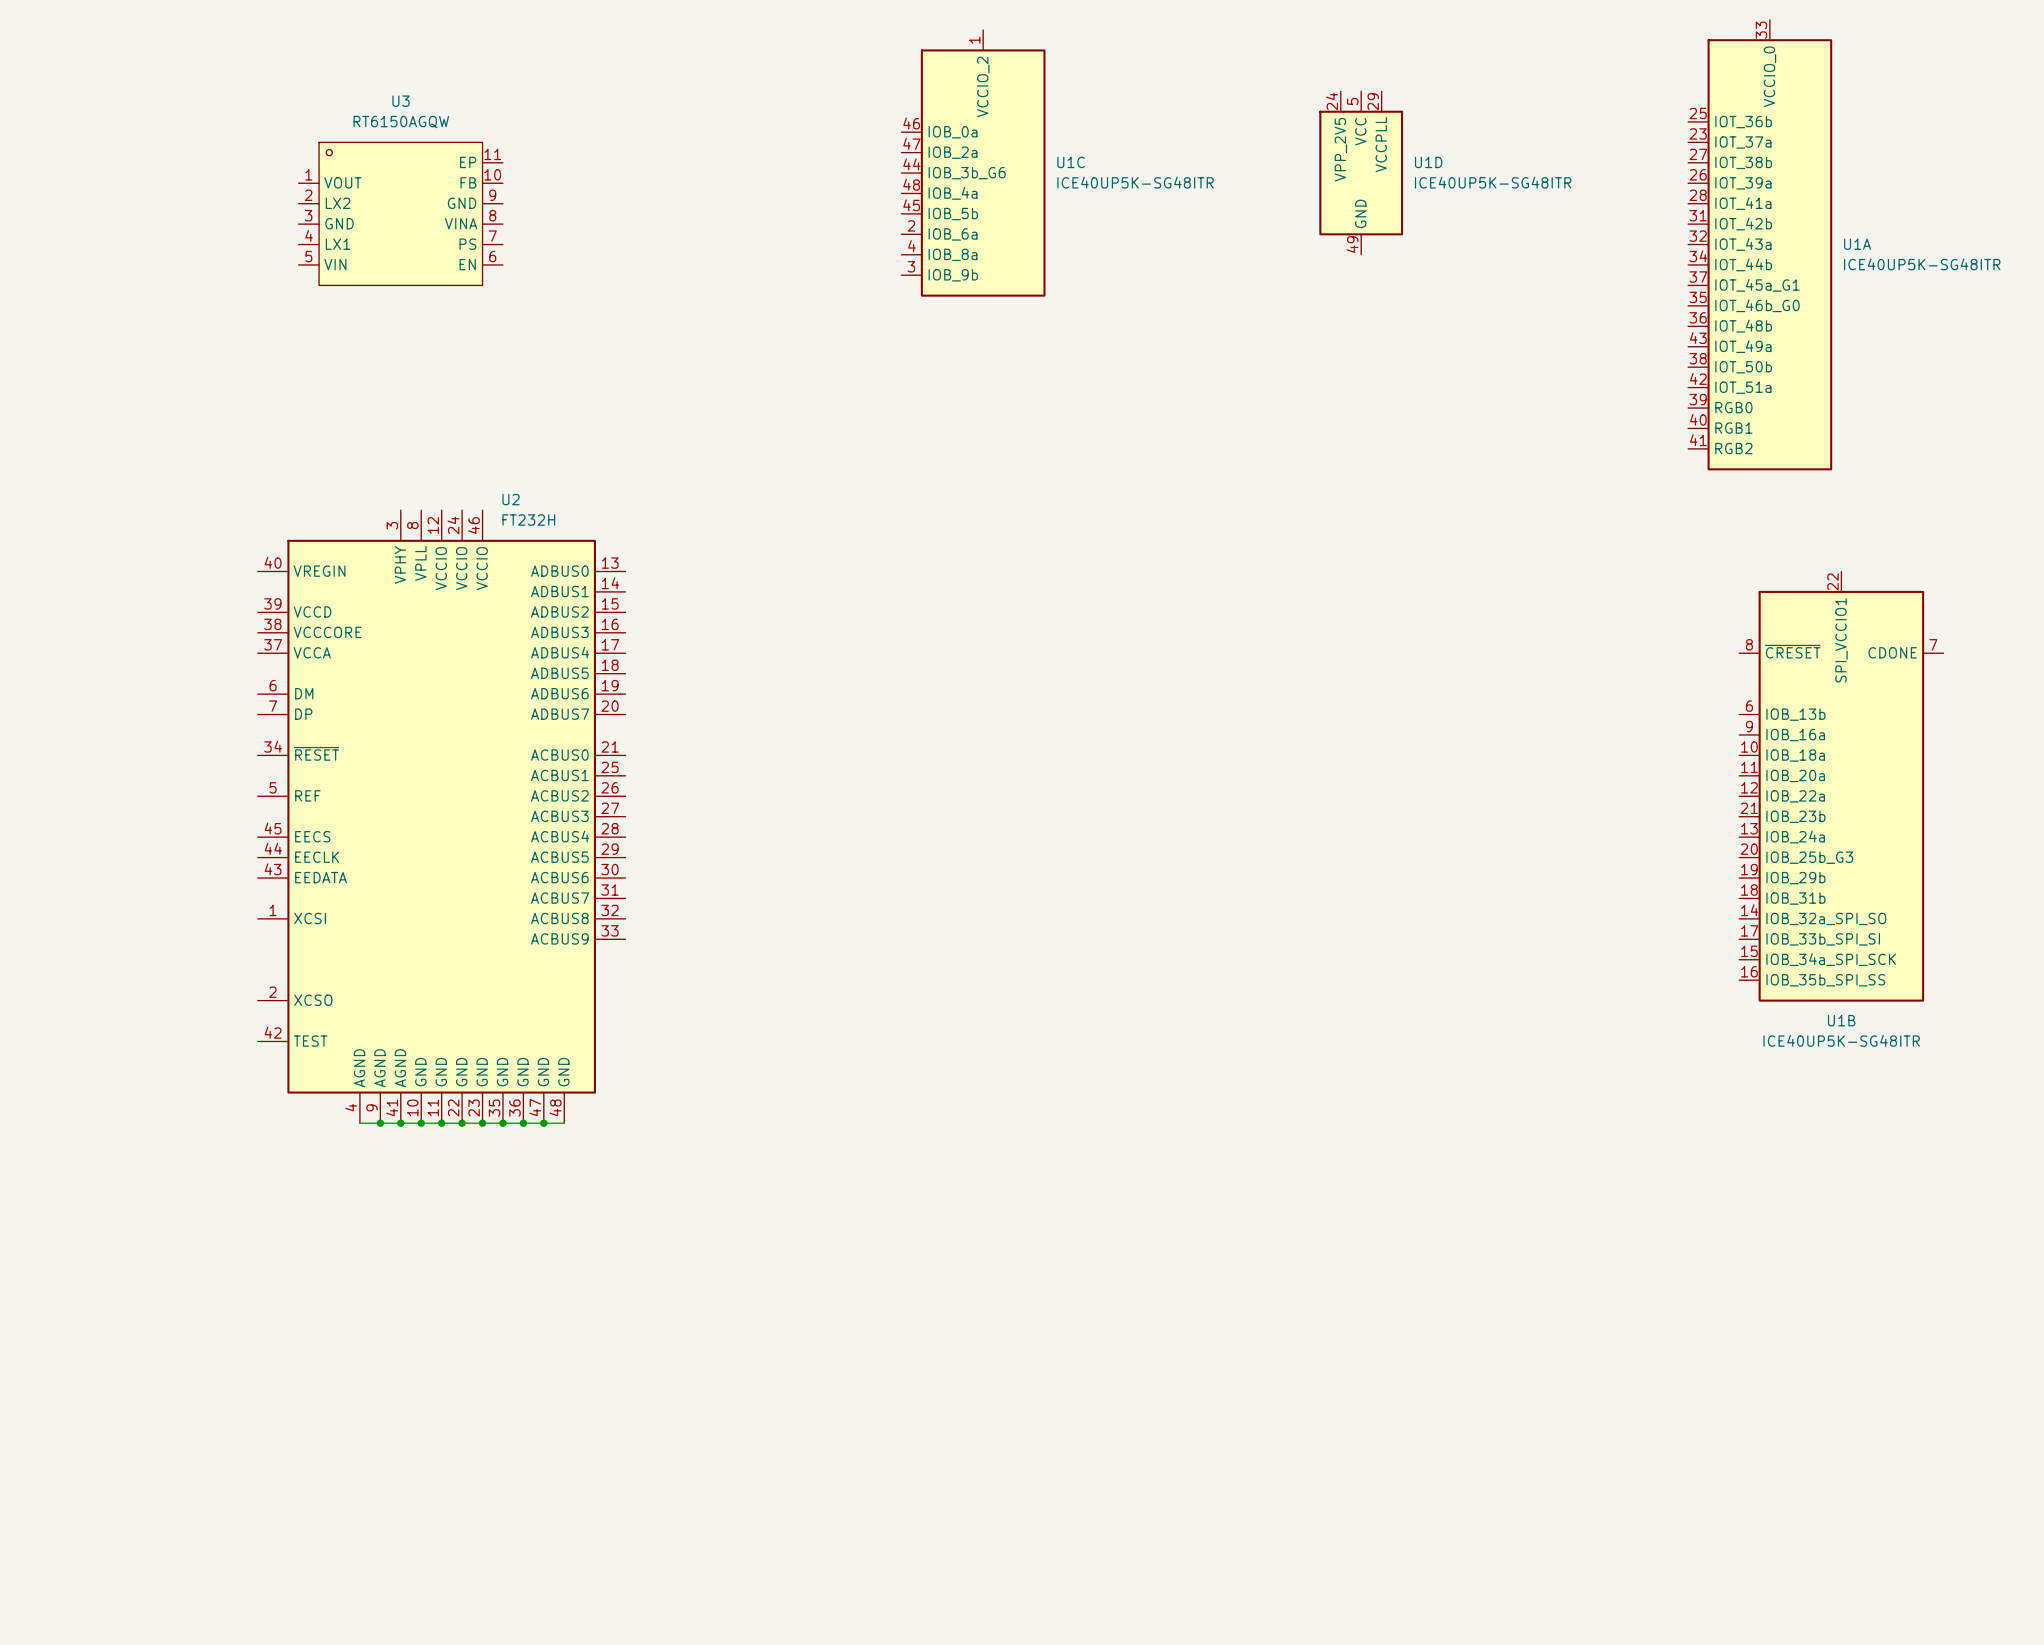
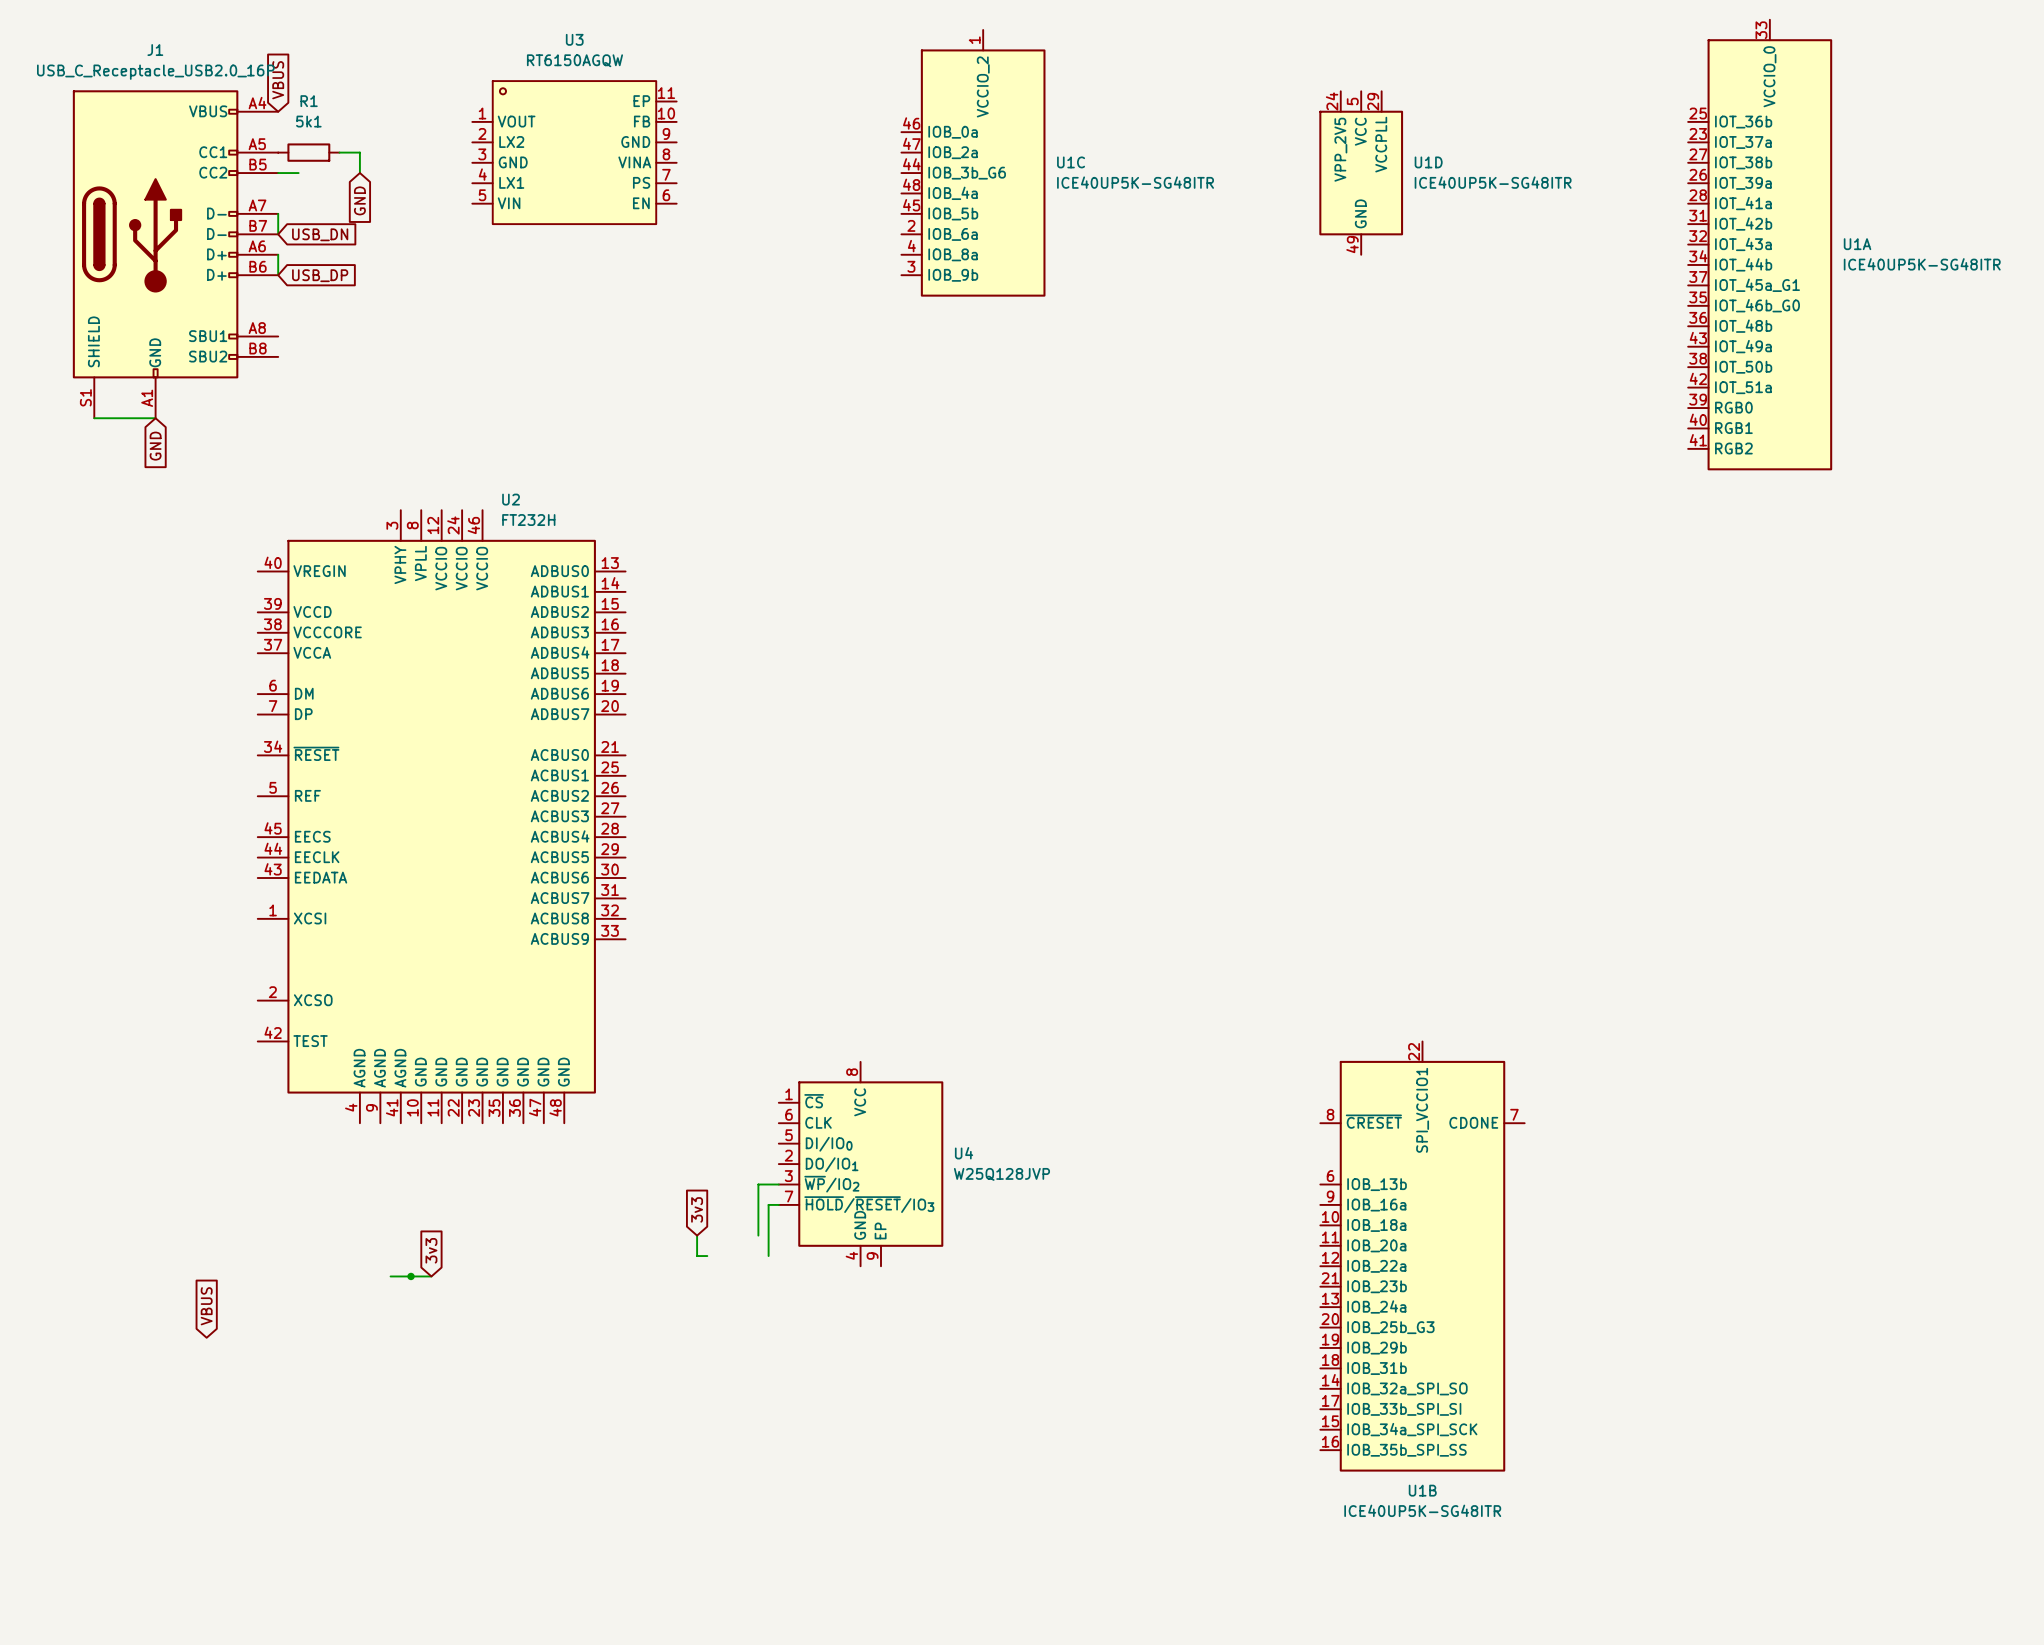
global label: none -> VBUS (278, 80)
R1: none -> 5k1 (308, 152)
wire: none -> (278, 173) (298, 173)
global label: none -> GND (359, 200)
wire: none -> (278, 213) (278, 234)
U3 position: (400, 213) -> (574, 152)
global label: none -> USB_DN (320, 234)
J1: none -> USB_C_Receptacle_USB2.0_16P (175, 254)
wire: none -> (278, 254) (278, 275)
global label: none -> USB_DP (320, 275)
wire: none -> (94, 418) (155, 418)
global label: none -> GND (155, 446)
U1B position: (1841, 786) -> (1422, 1256)
wire: (359, 1123) (564, 1123) -> none
junction: (380, 1123) -> none
junction: (400, 1123) -> none
junction: (421, 1123) -> none
junction: (441, 1123) -> none
junction: (462, 1123) -> none
junction: (482, 1123) -> none
junction: (502, 1123) -> none
junction: (523, 1123) -> none
junction: (543, 1123) -> none
U4: none -> W25Q128JVP (861, 1164)
wire: none -> (778, 1184) (758, 1184) (758, 1235)
wire: none -> (778, 1204) (768, 1204) (768, 1256)
global label: none -> 3v3 (697, 1209)
wire: none -> (697, 1235) (697, 1256) (707, 1256)
global label: none -> 3v3 (431, 1250)
wire: none -> (390, 1276) (431, 1276)
junction: none -> (411, 1276)
global label: none -> VBUS (206, 1306)

